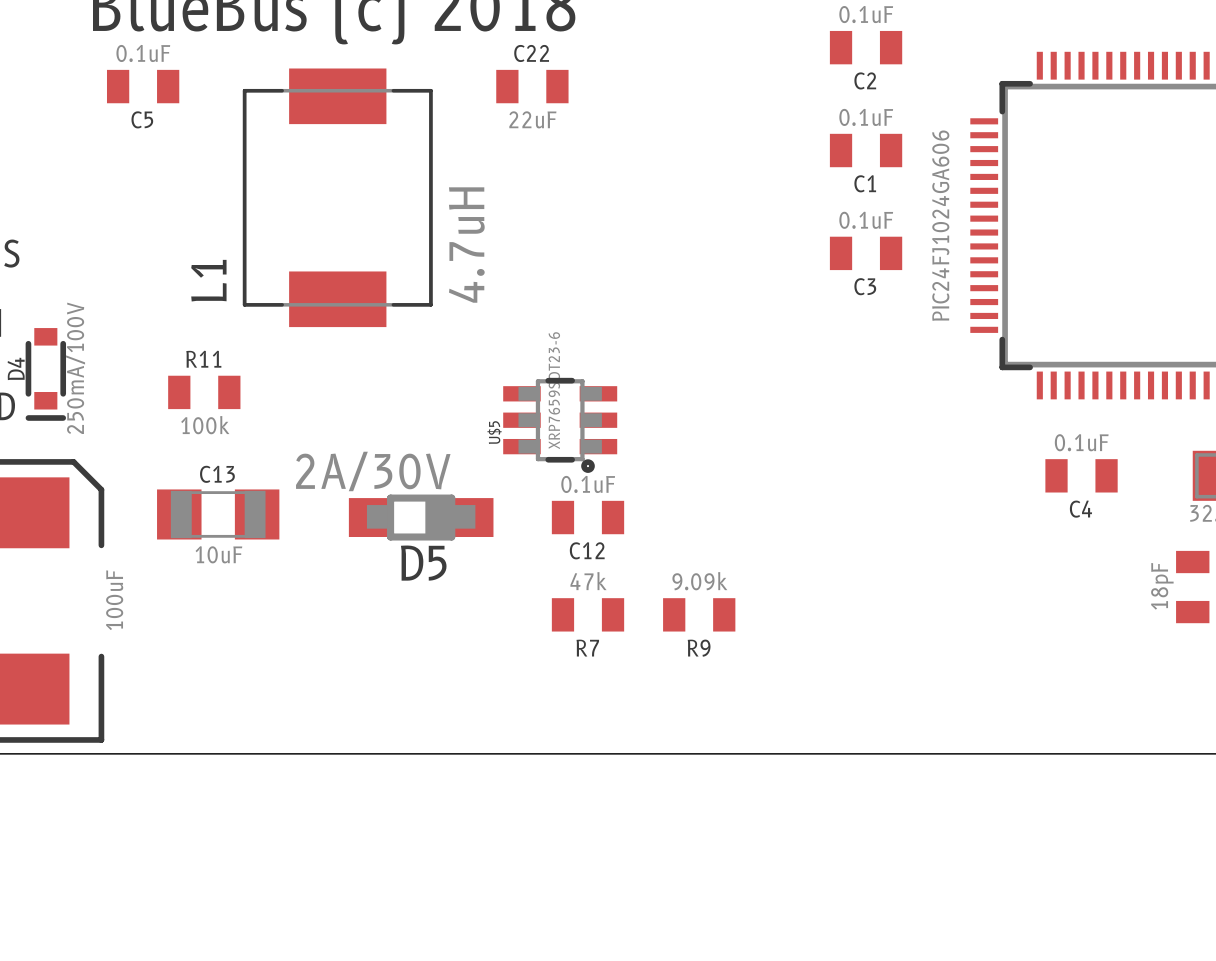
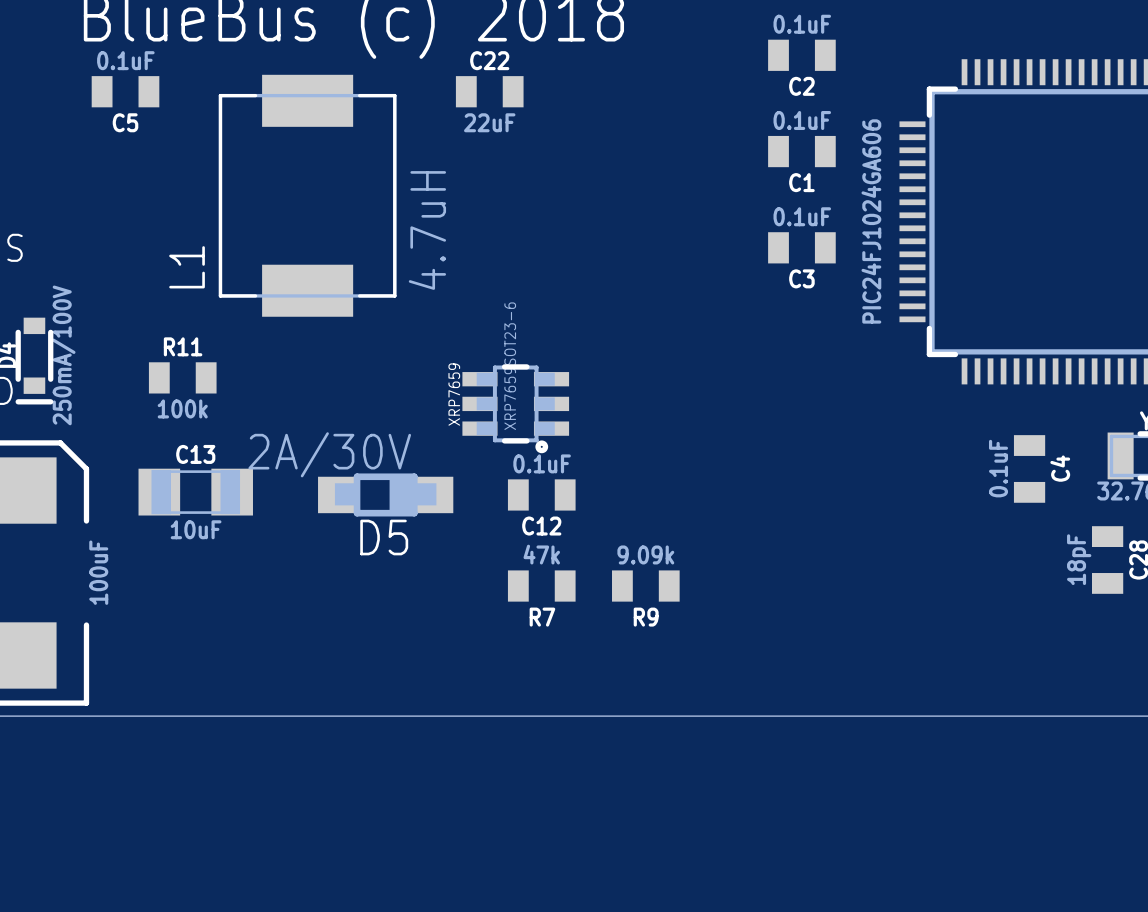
U$5 name: U$5 (494, 432) -> XRP7659 (454, 394)
C4 rotation: 0° (1081, 475) -> 90° clockwise (1029, 468)

